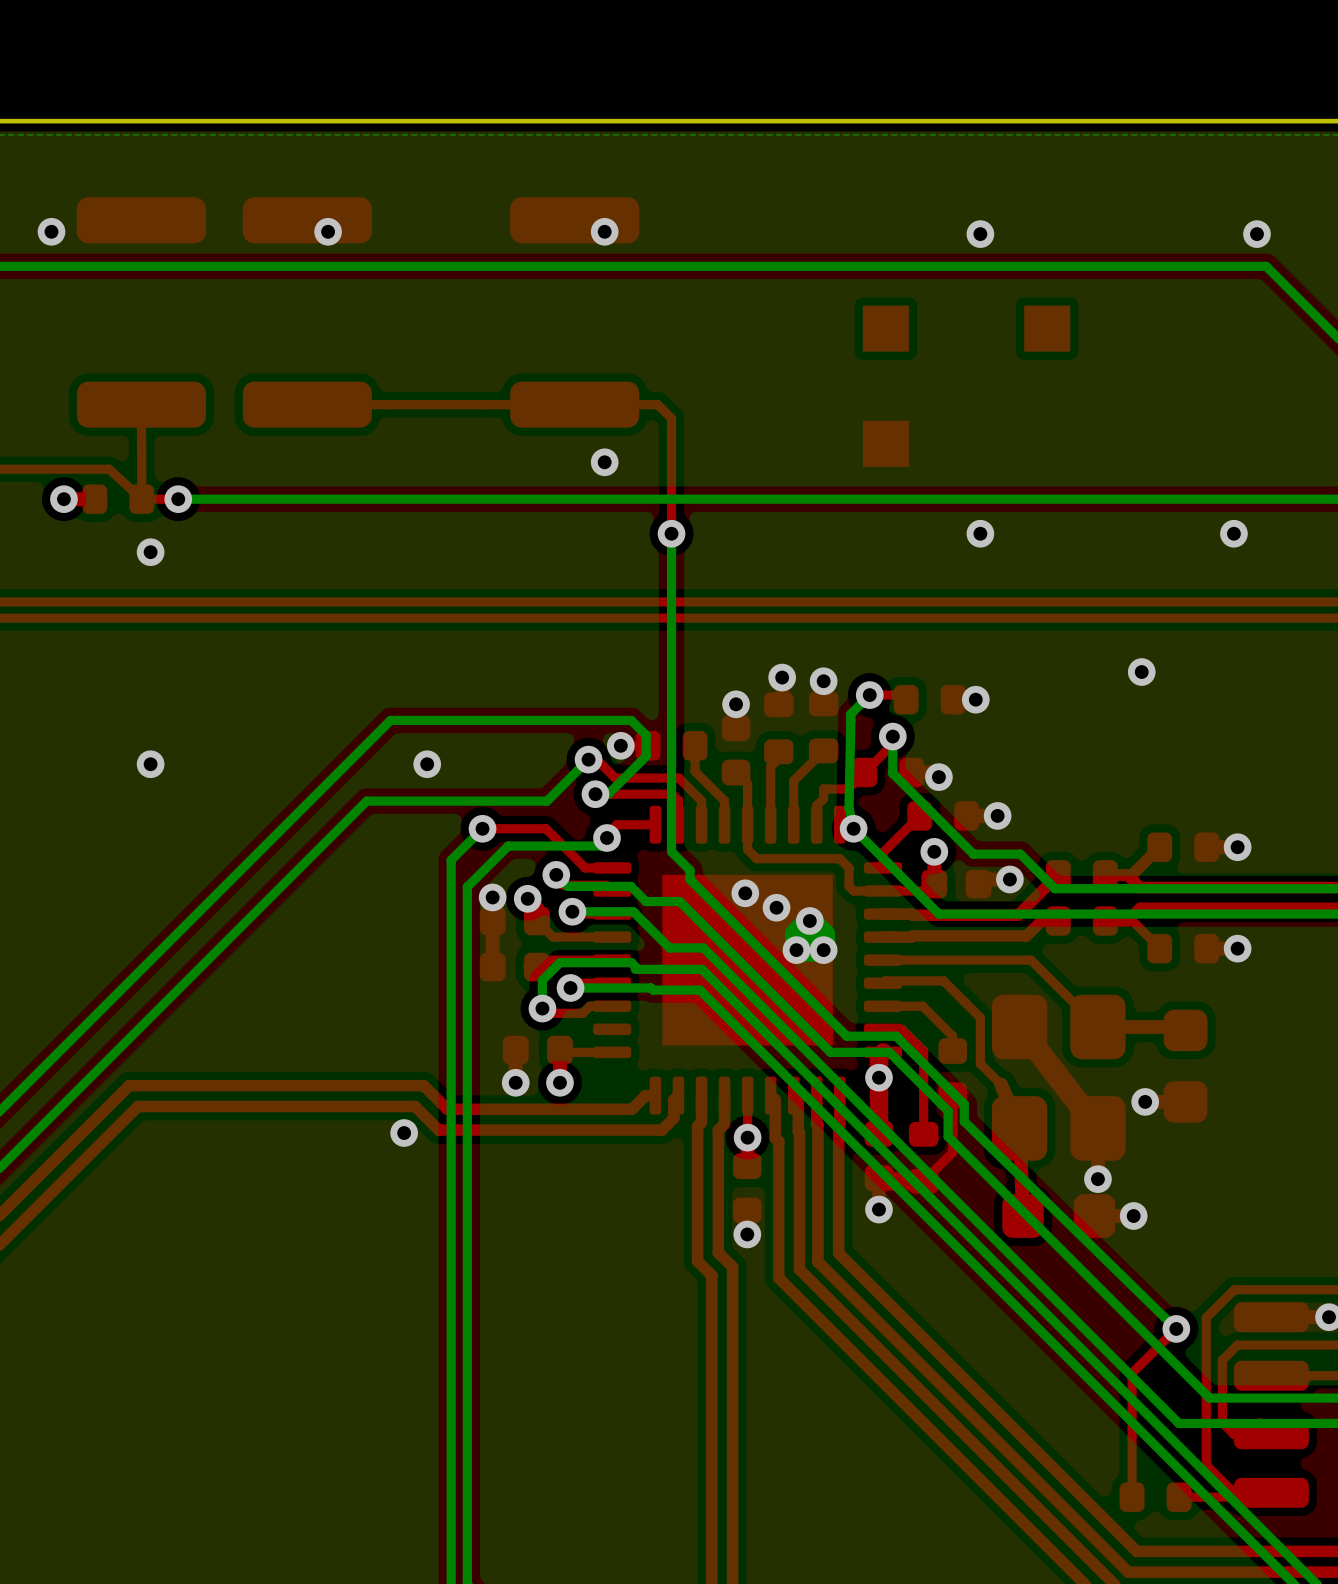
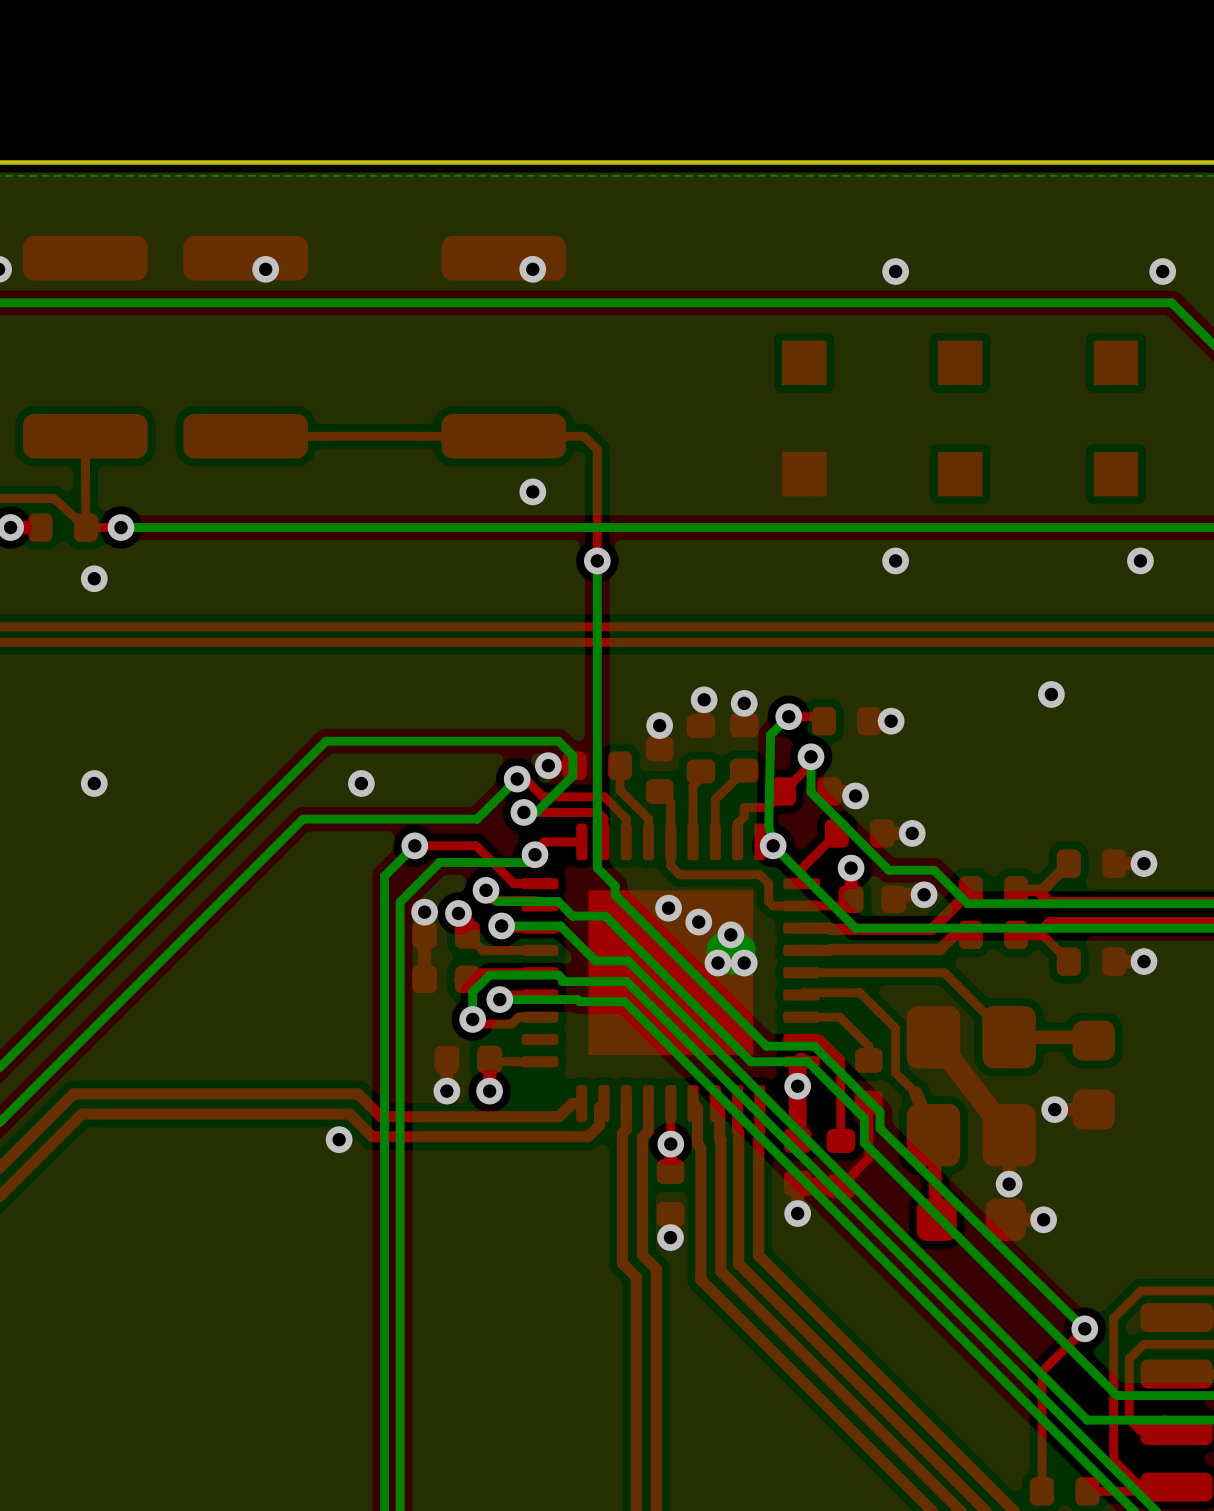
part: none -> (1115, 362)
part: none -> (960, 474)
part: none -> (1115, 474)

